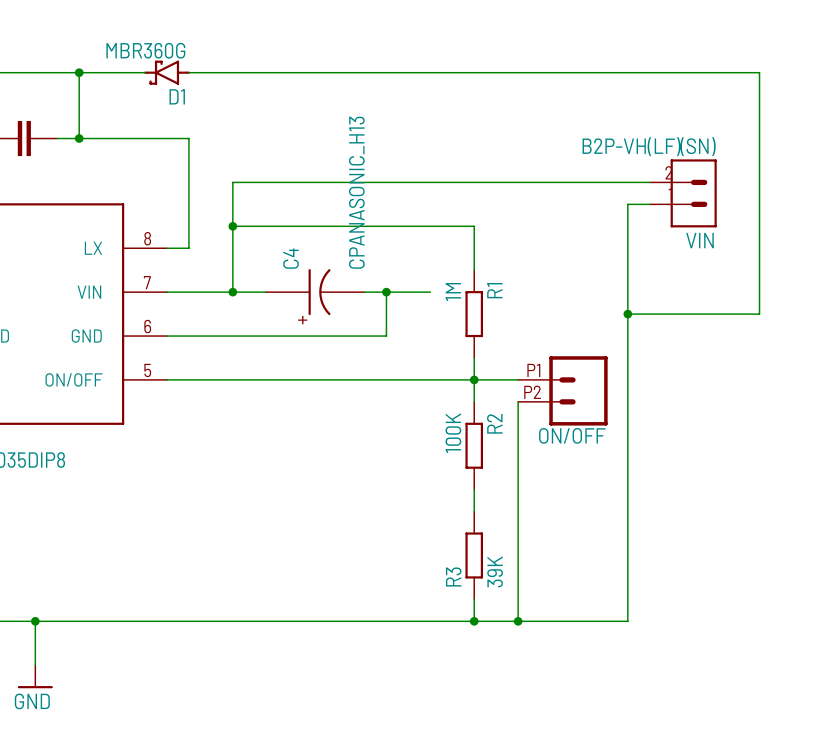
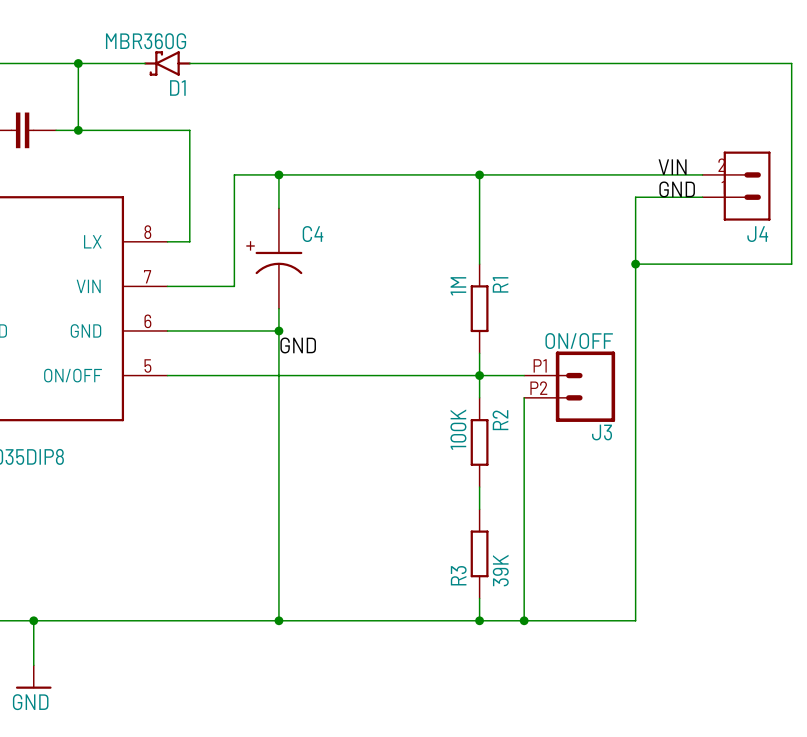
wire: (759, 72) (759, 314) (627, 314) -> (769, 63) (791, 63) (791, 264) (635, 264)
label: none -> VIN (672, 167)
wire: none -> (278, 174) (278, 208)
junction: none -> (278, 174)
junction: none -> (479, 174)
C4 value: CPANASONIC_H13 (356, 192) -> none
VIN: B2P-VH(LF)(SN) (683, 193) -> none
J4: none -> (736, 186)
label: none -> GND (677, 189)
wire: (232, 226) (474, 226) -> (479, 174) (479, 219)
junction: (232, 226) -> none
wire: (232, 292) (265, 292) -> none
junction: (232, 292) -> none
C4 rotation: 0° (319, 292) -> 90° clockwise (278, 263)
wire: (364, 292) (430, 292) -> none
wire: (386, 292) (386, 336) (276, 336) -> none
junction: (386, 292) -> none
wire: none -> (278, 308) (278, 620)
junction position: (627, 314) -> (635, 264)
junction: none -> (278, 330)
ON/OFF value: none -> ON/OFF (579, 341)
label: none -> GND (298, 345)
ON/OFF name: ON/OFF (572, 435) -> J3 (602, 432)
junction: none -> (278, 620)

